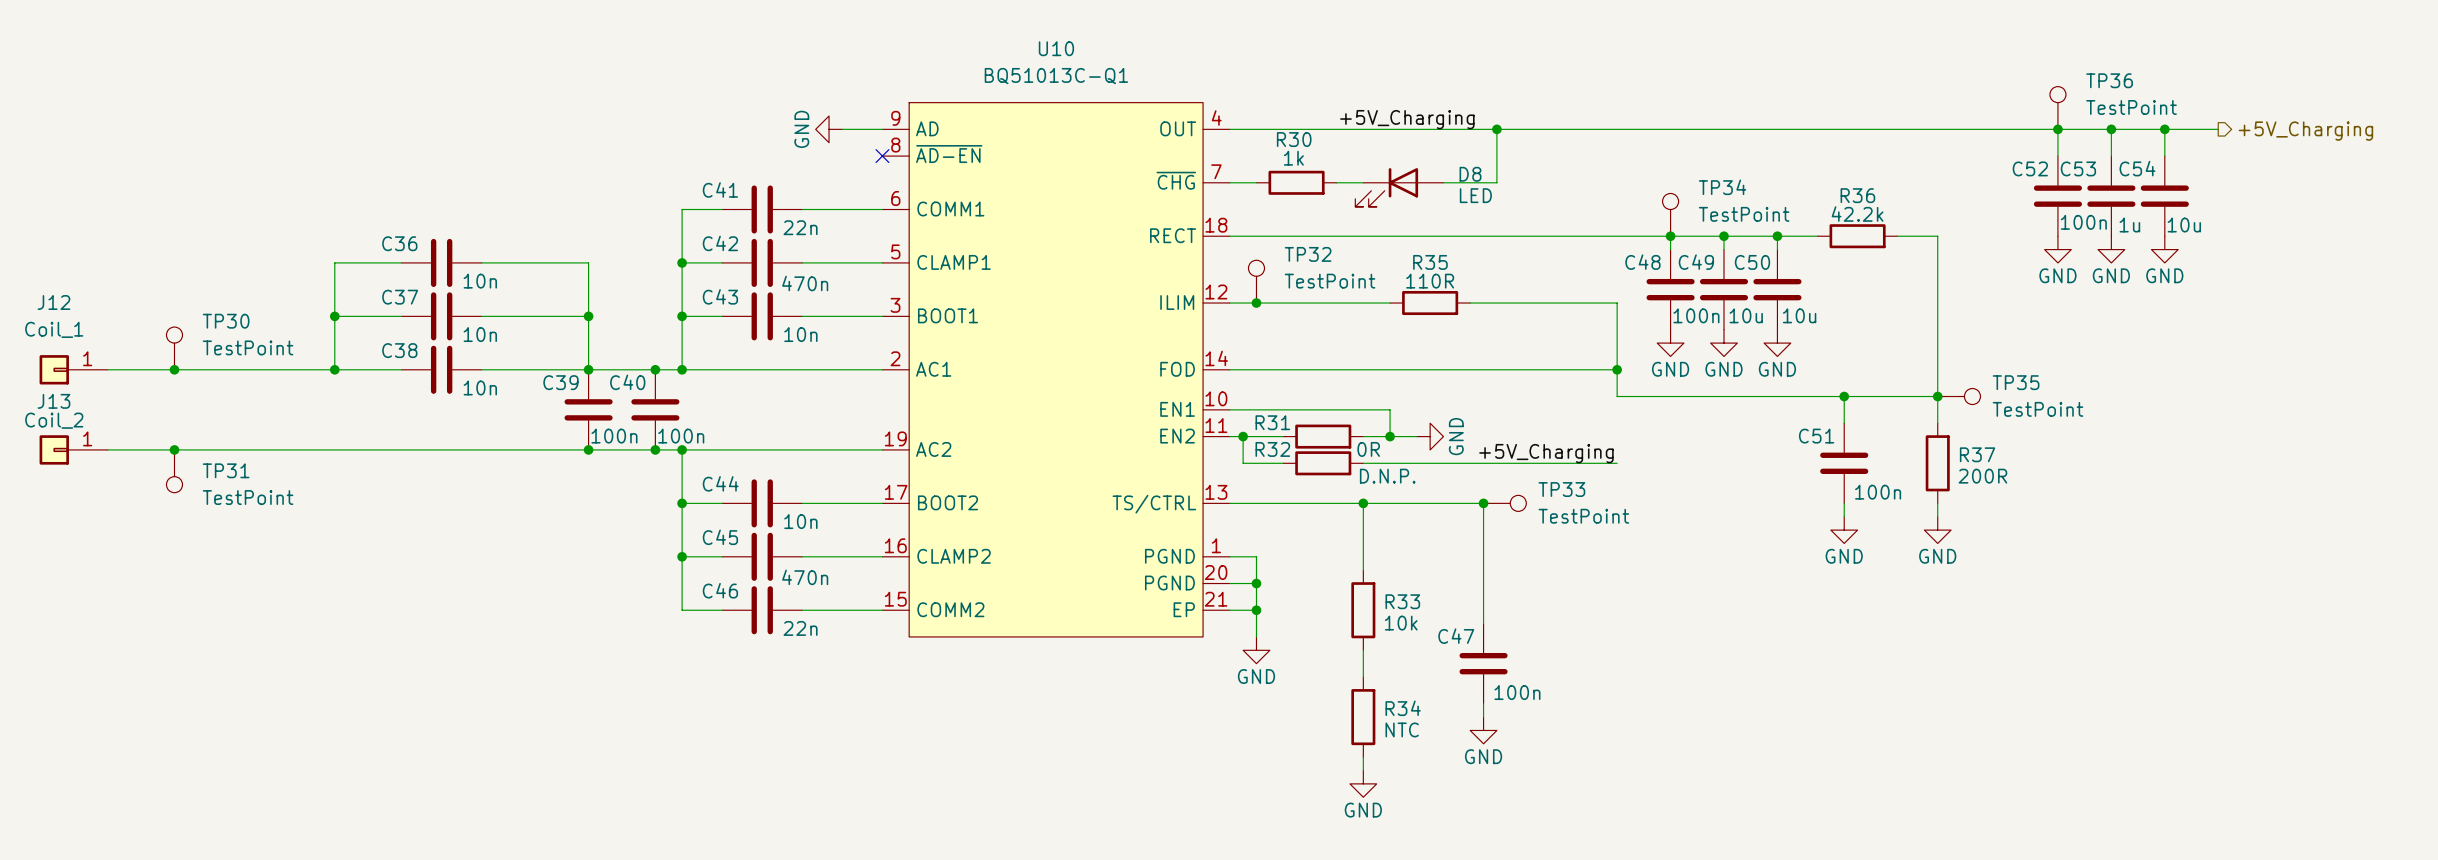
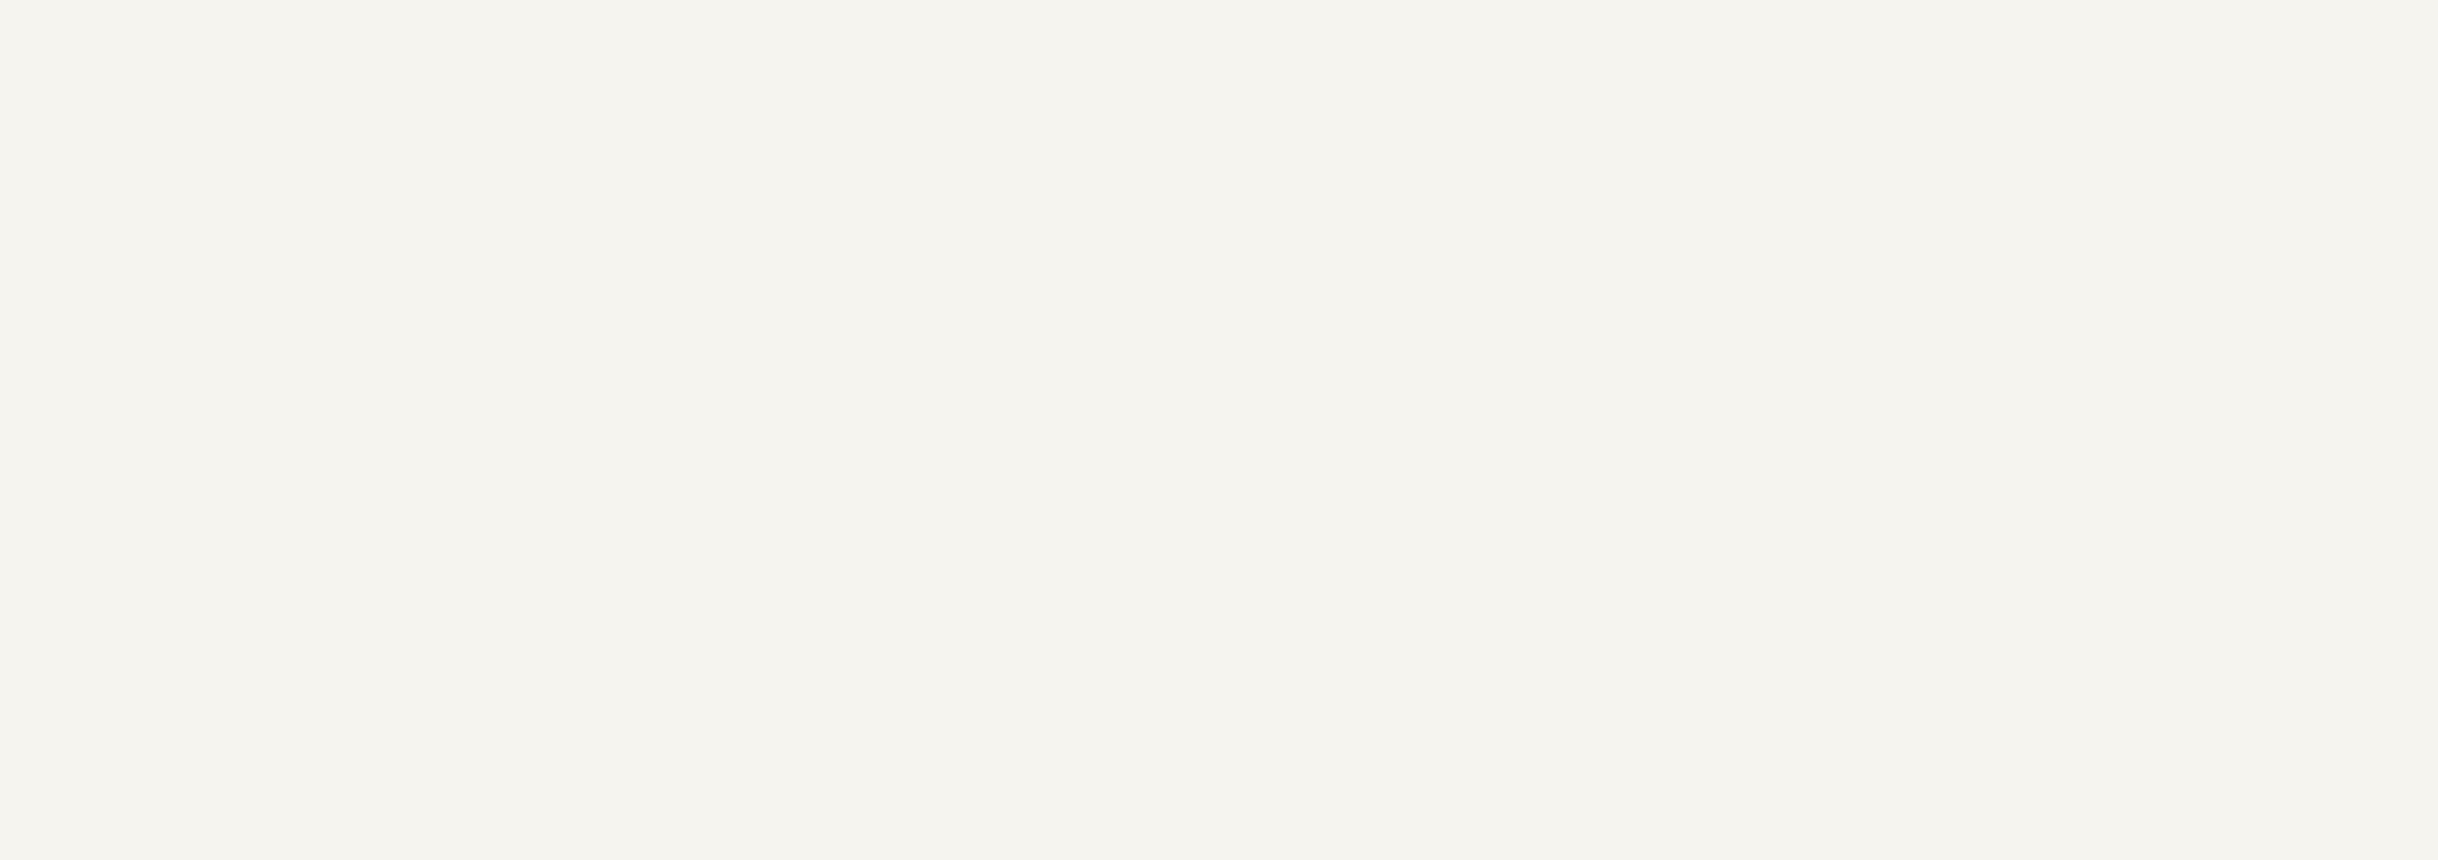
TP36: TestPoint (2057, 107) -> none
label: +5V_Charging (1407, 119) -> none
power symbol: GND (829, 129) -> none
wire: (842, 129) (882, 129) -> none
wire: (1229, 129) (2218, 129) -> none
wire: (1496, 129) (1496, 182) (1443, 182) -> none
junction: (1496, 129) -> none
wire: (2057, 129) (2057, 156) -> none
junction: (2057, 129) -> none
wire: (2111, 129) (2111, 156) -> none
junction: (2111, 129) -> none
wire: (2164, 129) (2164, 156) -> none
junction: (2164, 129) -> none
hierarchical label: +5V_Charging (2305, 131) -> none
no-connect mark: (882, 156) -> none
wire: (1229, 182) (1256, 182) -> none
R30: 1k (1296, 182) -> none
wire: (1336, 182) (1363, 182) -> none
D8: LED (1399, 187) -> none
C52: 100n (2057, 196) -> none
C53: 1u (2111, 196) -> none
C54: 10u (2164, 196) -> none
wire: (722, 209) (682, 209) (682, 369) -> none
C41: 22n (762, 209) -> none
wire: (802, 209) (882, 209) -> none
TP34: TestPoint (1670, 214) -> none
wire: (1229, 236) (1817, 236) -> none
wire: (1670, 236) (1670, 249) -> none
junction: (1670, 236) -> none
wire: (1724, 236) (1724, 249) -> none
junction: (1724, 236) -> none
wire: (1777, 236) (1777, 249) -> none
junction: (1777, 236) -> none
R36: 42.2k (1857, 236) -> none
wire: (1897, 236) (1937, 236) (1937, 423) -> none
power symbol: GND (2057, 249) -> none
power symbol: GND (2111, 249) -> none
power symbol: GND (2164, 249) -> none
wire: (401, 262) (334, 262) (334, 369) -> none
C36: 10n (441, 262) -> none
wire: (481, 262) (588, 262) (588, 369) -> none
wire: (682, 262) (722, 262) -> none
junction: (682, 262) -> none
C42: 470n (762, 262) -> none
wire: (802, 262) (882, 262) -> none
TP32: TestPoint (1256, 281) -> none
C48: 100n (1670, 289) -> none
C49: 10u (1724, 289) -> none
C50: 10u (1777, 289) -> none
wire: (1229, 303) (1390, 303) -> none
junction: (1256, 303) -> none
R35: 110R (1430, 303) -> none
wire: (1470, 303) (1617, 303) (1617, 396) (1937, 396) -> none
wire: (334, 316) (401, 316) -> none
junction: (334, 316) -> none
C37: 10n (441, 316) -> none
wire: (481, 316) (588, 316) -> none
junction: (588, 316) -> none
wire: (682, 316) (722, 316) -> none
junction: (682, 316) -> none
C43: 10n (762, 316) -> none
wire: (802, 316) (882, 316) -> none
power symbol: GND (1670, 343) -> none
power symbol: GND (1724, 343) -> none
power symbol: GND (1777, 343) -> none
TP30: TestPoint (174, 348) -> none
J12: Coil_1 (73, 369) -> none
wire: (107, 369) (401, 369) -> none
junction: (174, 369) -> none
junction: (334, 369) -> none
C38: 10n (441, 369) -> none
wire: (481, 369) (882, 369) -> none
junction: (588, 369) -> none
junction: (655, 369) -> none
junction: (682, 369) -> none
U10: BQ51013C-Q1 (1056, 369) -> none
wire: (1229, 369) (1617, 369) -> none
junction: (1617, 369) -> none
wire: (1844, 396) (1844, 423) -> none
junction: (1844, 396) -> none
junction: (1937, 396) -> none
TP35: TestPoint (1959, 396) -> none
C39: 100n (588, 409) -> none
C40: 100n (655, 409) -> none
wire: (1229, 409) (1390, 409) (1390, 436) -> none
wire: (1229, 436) (1283, 436) -> none
wire: (1243, 436) (1243, 463) (1283, 463) -> none
junction: (1243, 436) -> none
R31: 0R (1323, 436) -> none
wire: (1363, 436) (1416, 436) -> none
junction: (1390, 436) -> none
power symbol: GND (1430, 436) -> none
J13: Coil_2 (73, 449) -> none
wire: (107, 449) (882, 449) -> none
junction: (174, 449) -> none
junction: (588, 449) -> none
junction: (655, 449) -> none
wire: (682, 449) (682, 610) (722, 610) -> none
junction: (682, 449) -> none
label: +5V_Charging (1546, 453) -> none
R32: D.N.P. (1323, 463) -> none
wire: (1363, 463) (1617, 463) -> none
C51: 100n (1844, 463) -> none
R37: 200R (1937, 463) -> none
TP31: TestPoint (174, 471) -> none
wire: (682, 503) (722, 503) -> none
junction: (682, 503) -> none
C44: 10n (762, 503) -> none
wire: (802, 503) (882, 503) -> none
wire: (1229, 503) (1483, 503) (1483, 623) -> none
wire: (1363, 503) (1363, 570) -> none
junction: (1363, 503) -> none
junction: (1483, 503) -> none
TP33: TestPoint (1504, 503) -> none
wire: (1844, 503) (1844, 516) -> none
wire: (1937, 503) (1937, 516) -> none
power symbol: GND (1844, 530) -> none
power symbol: GND (1937, 530) -> none
wire: (682, 556) (722, 556) -> none
junction: (682, 556) -> none
C45: 470n (762, 556) -> none
wire: (802, 556) (882, 556) -> none
wire: (1229, 556) (1256, 556) (1256, 636) -> none
wire: (1229, 583) (1256, 583) -> none
junction: (1256, 583) -> none
C46: 22n (762, 610) -> none
wire: (802, 610) (882, 610) -> none
wire: (1229, 610) (1256, 610) -> none
junction: (1256, 610) -> none
R33: 10k (1363, 610) -> none
power symbol: GND (1256, 650) -> none
wire: (1363, 650) (1363, 677) -> none
C47: 100n (1483, 663) -> none
wire: (1483, 703) (1483, 717) -> none
R34: NTC (1363, 717) -> none
power symbol: GND (1483, 730) -> none
wire: (1363, 757) (1363, 770) -> none
power symbol: GND (1363, 783) -> none

